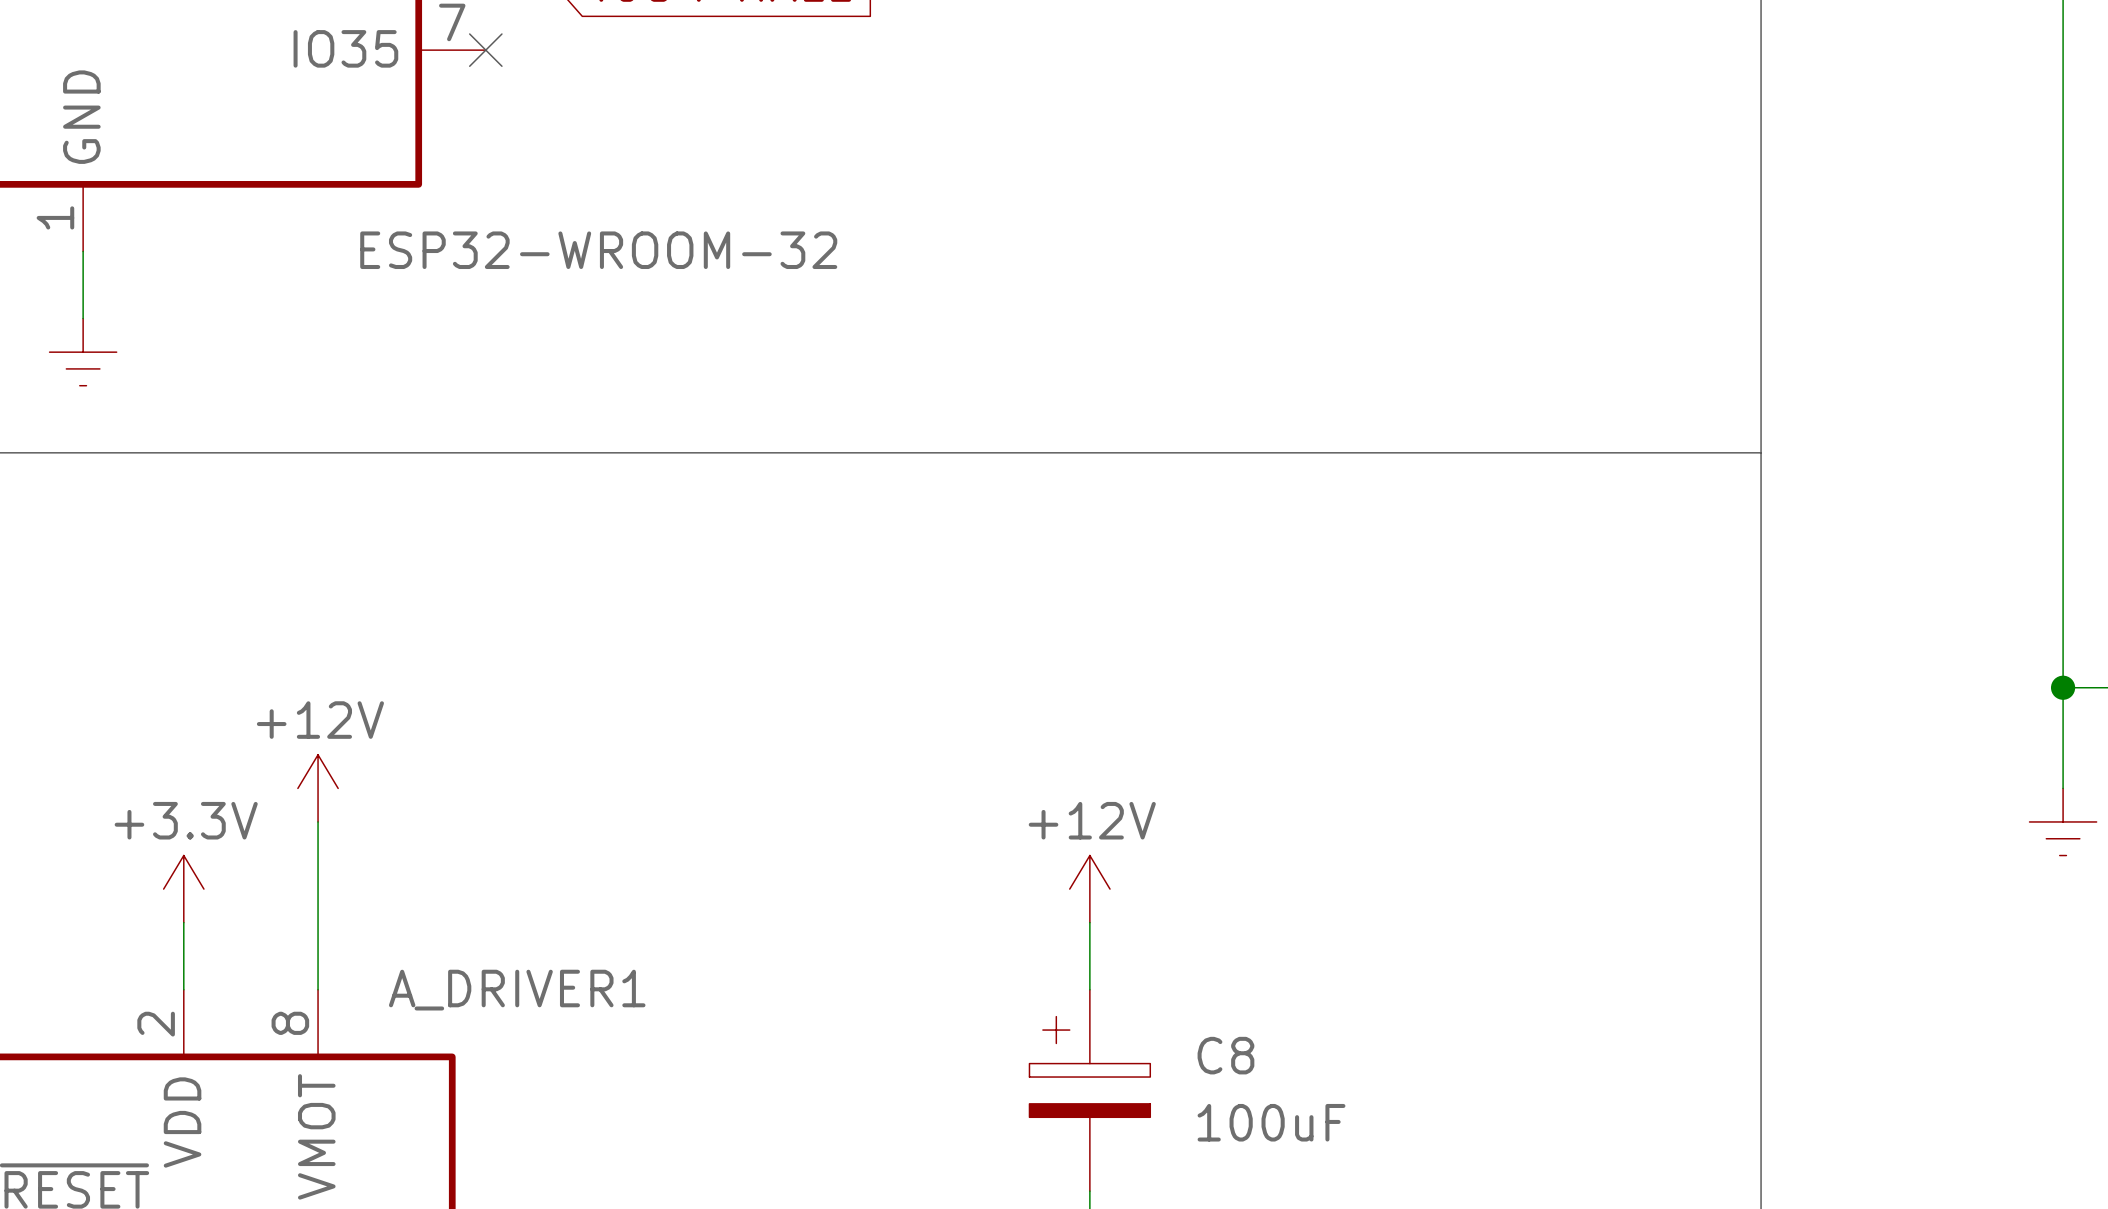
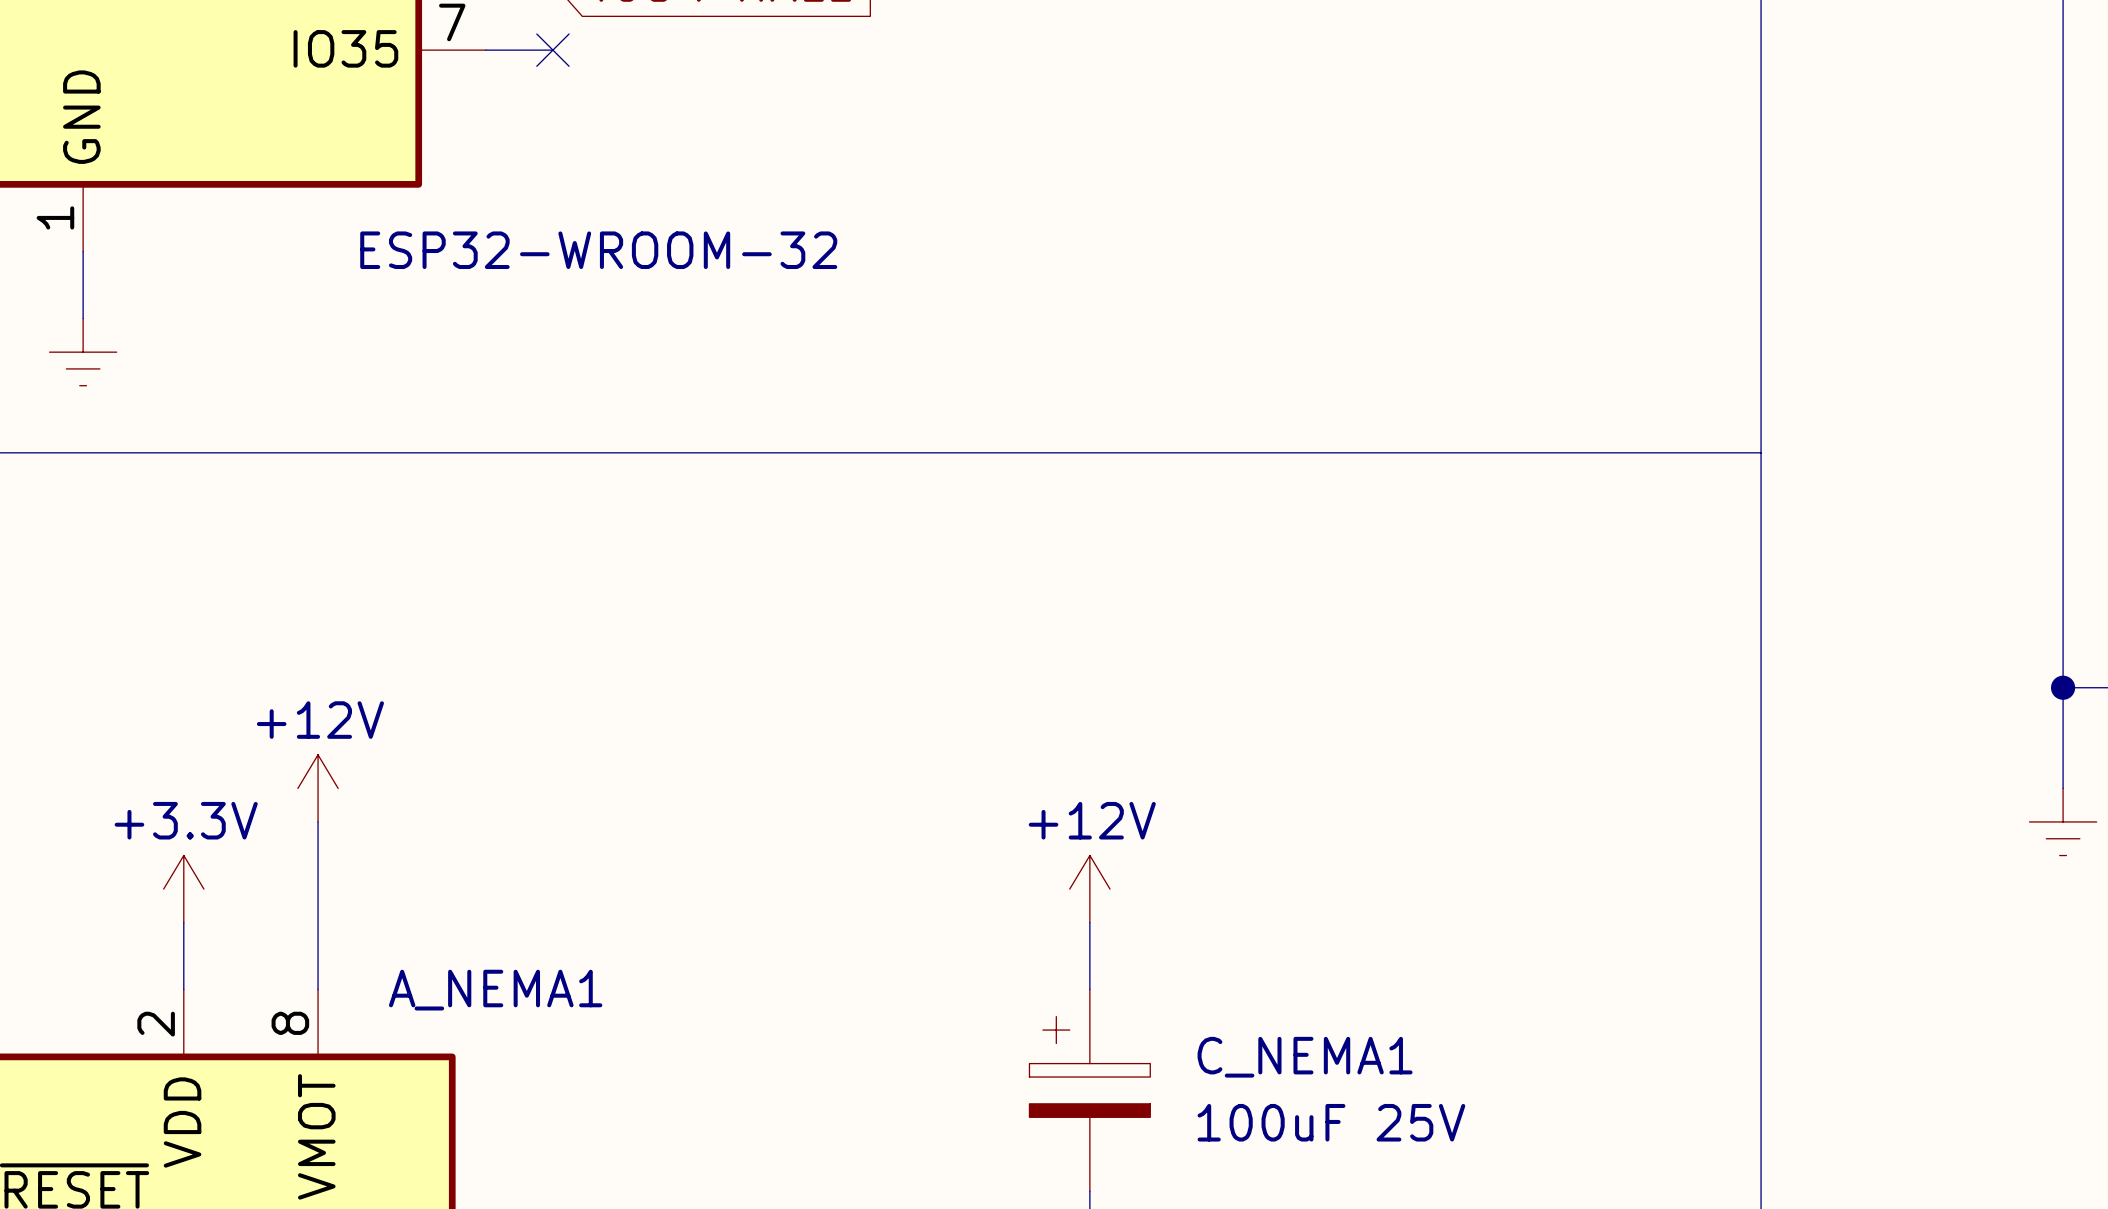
wire: none -> (485, 50) (552, 50)
no-connect mark position: (485, 50) -> (552, 50)
A_DRIVER1 name: A_DRIVER1 (517, 990) -> A_NEMA1 (495, 990)
C8 name: C8 (1225, 1055) -> C_NEMA1 (1305, 1057)
C8 value: 100uF (1271, 1122) -> 100uF 25V (1331, 1122)

